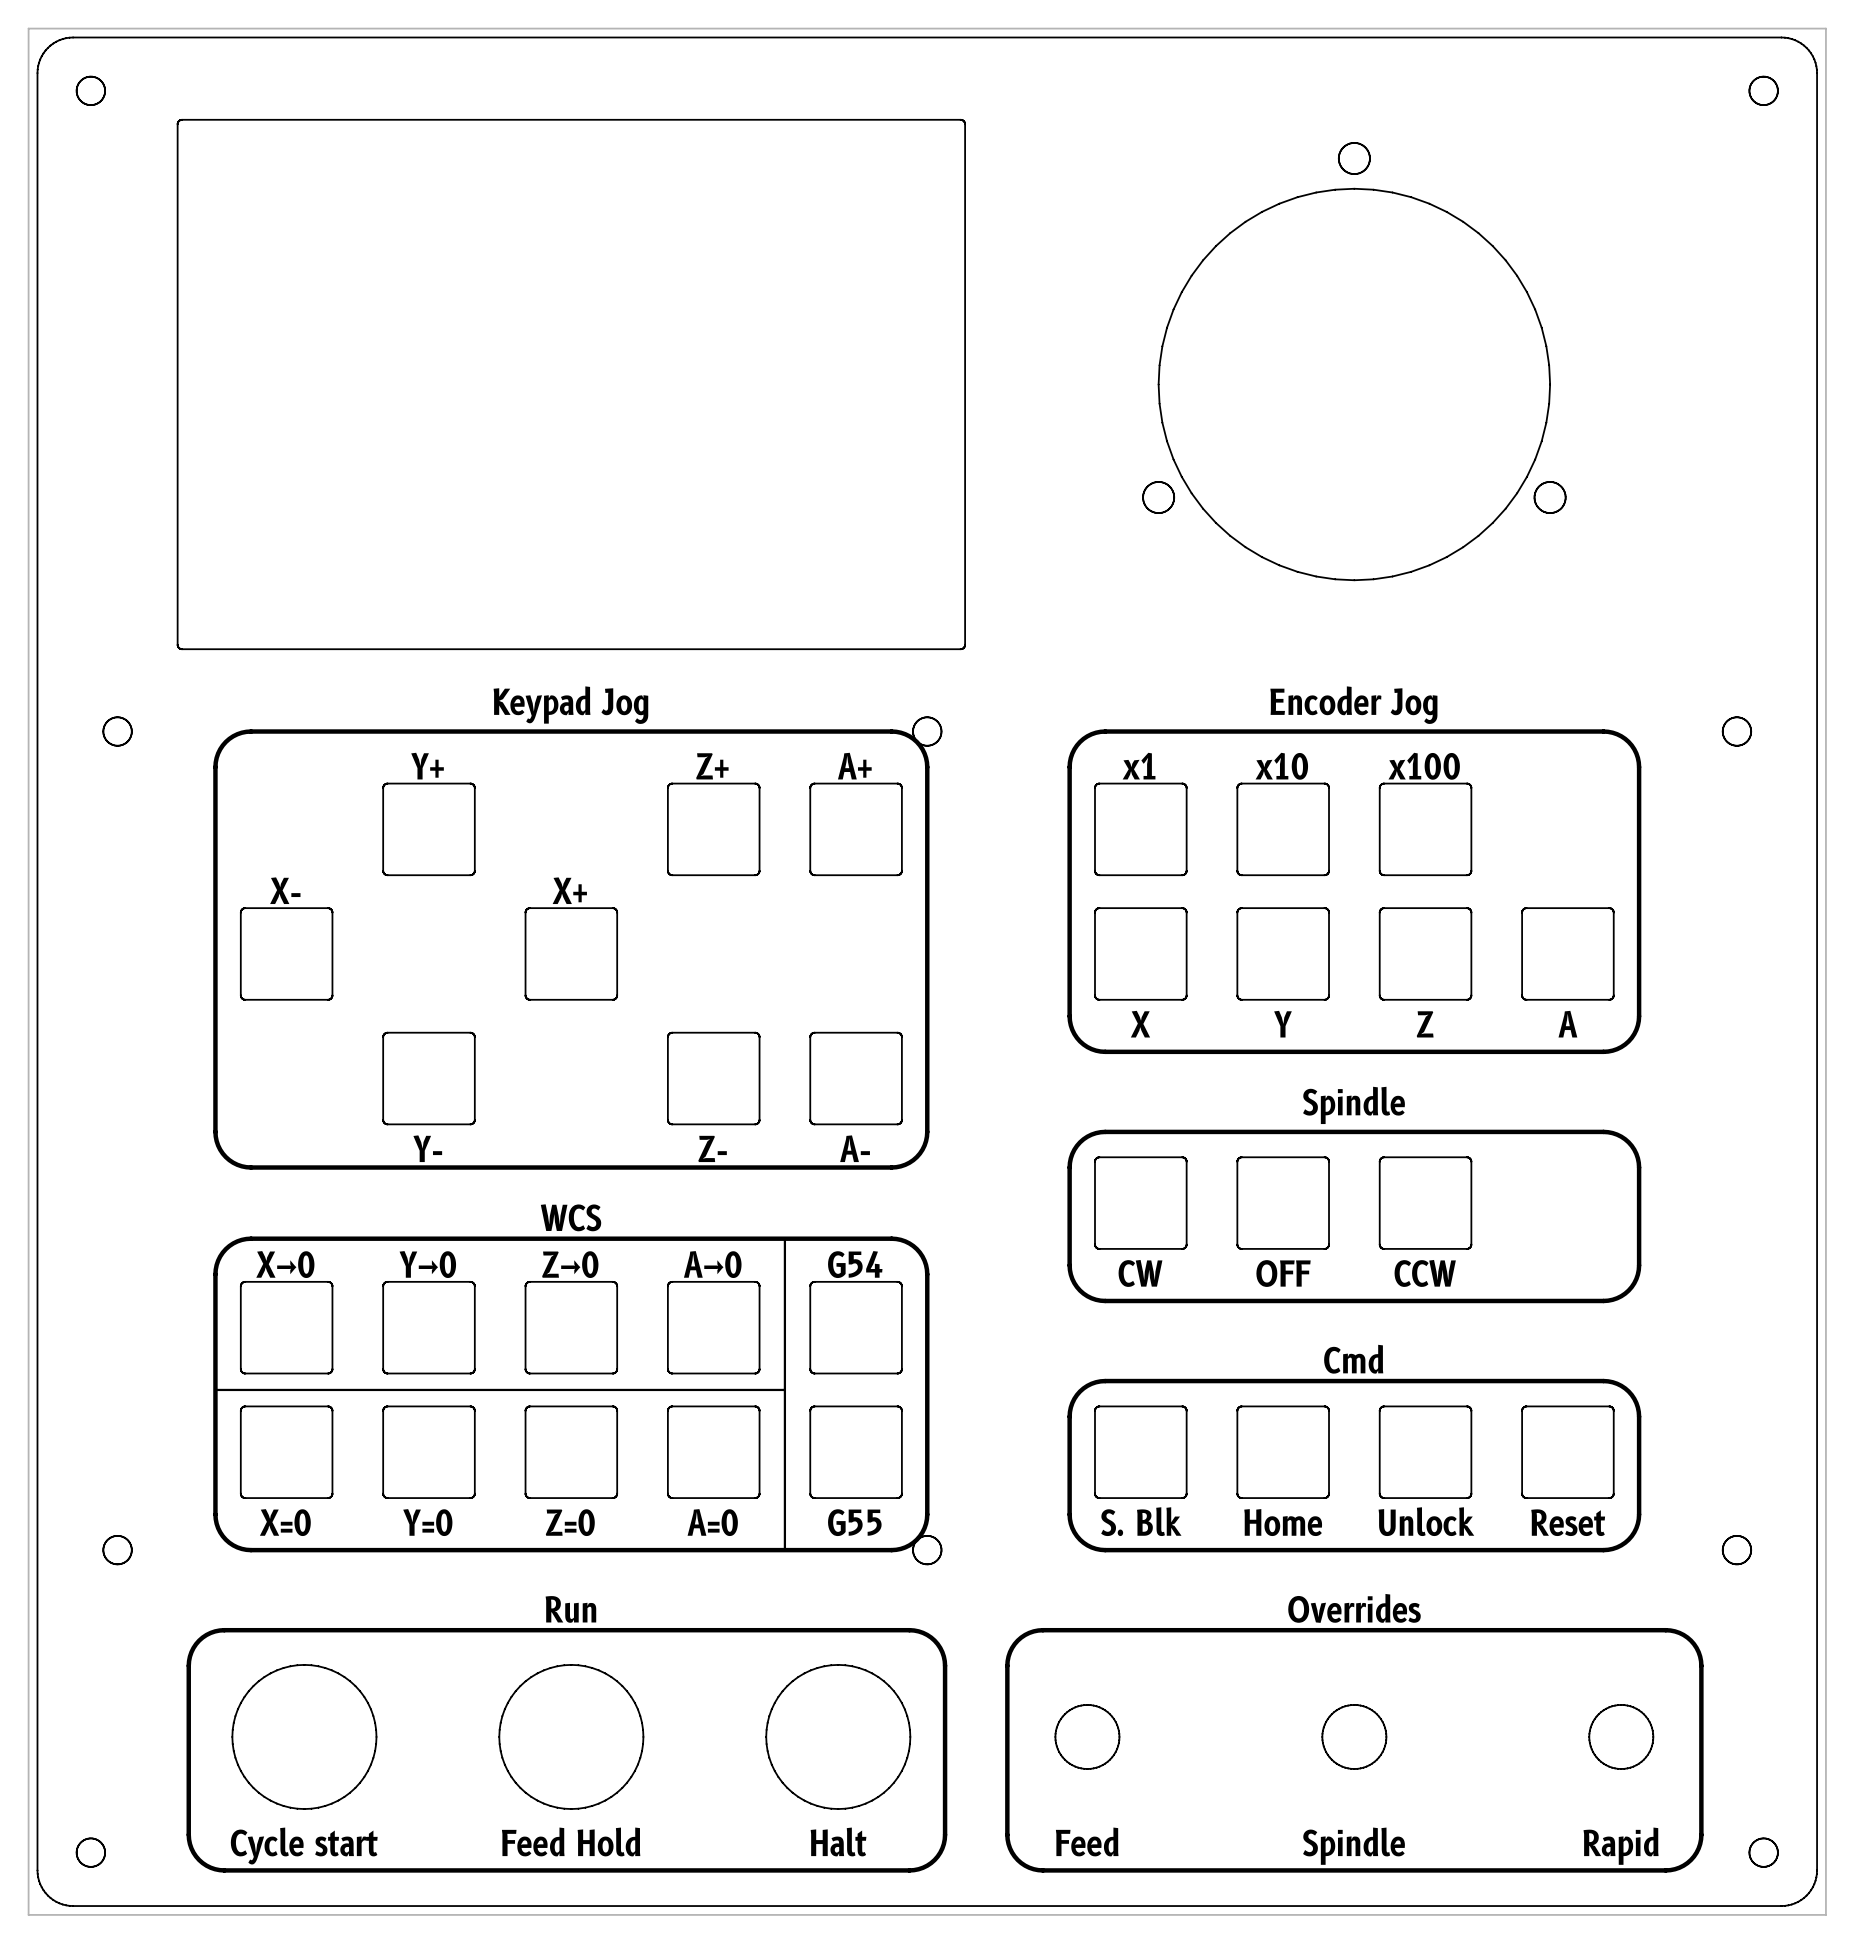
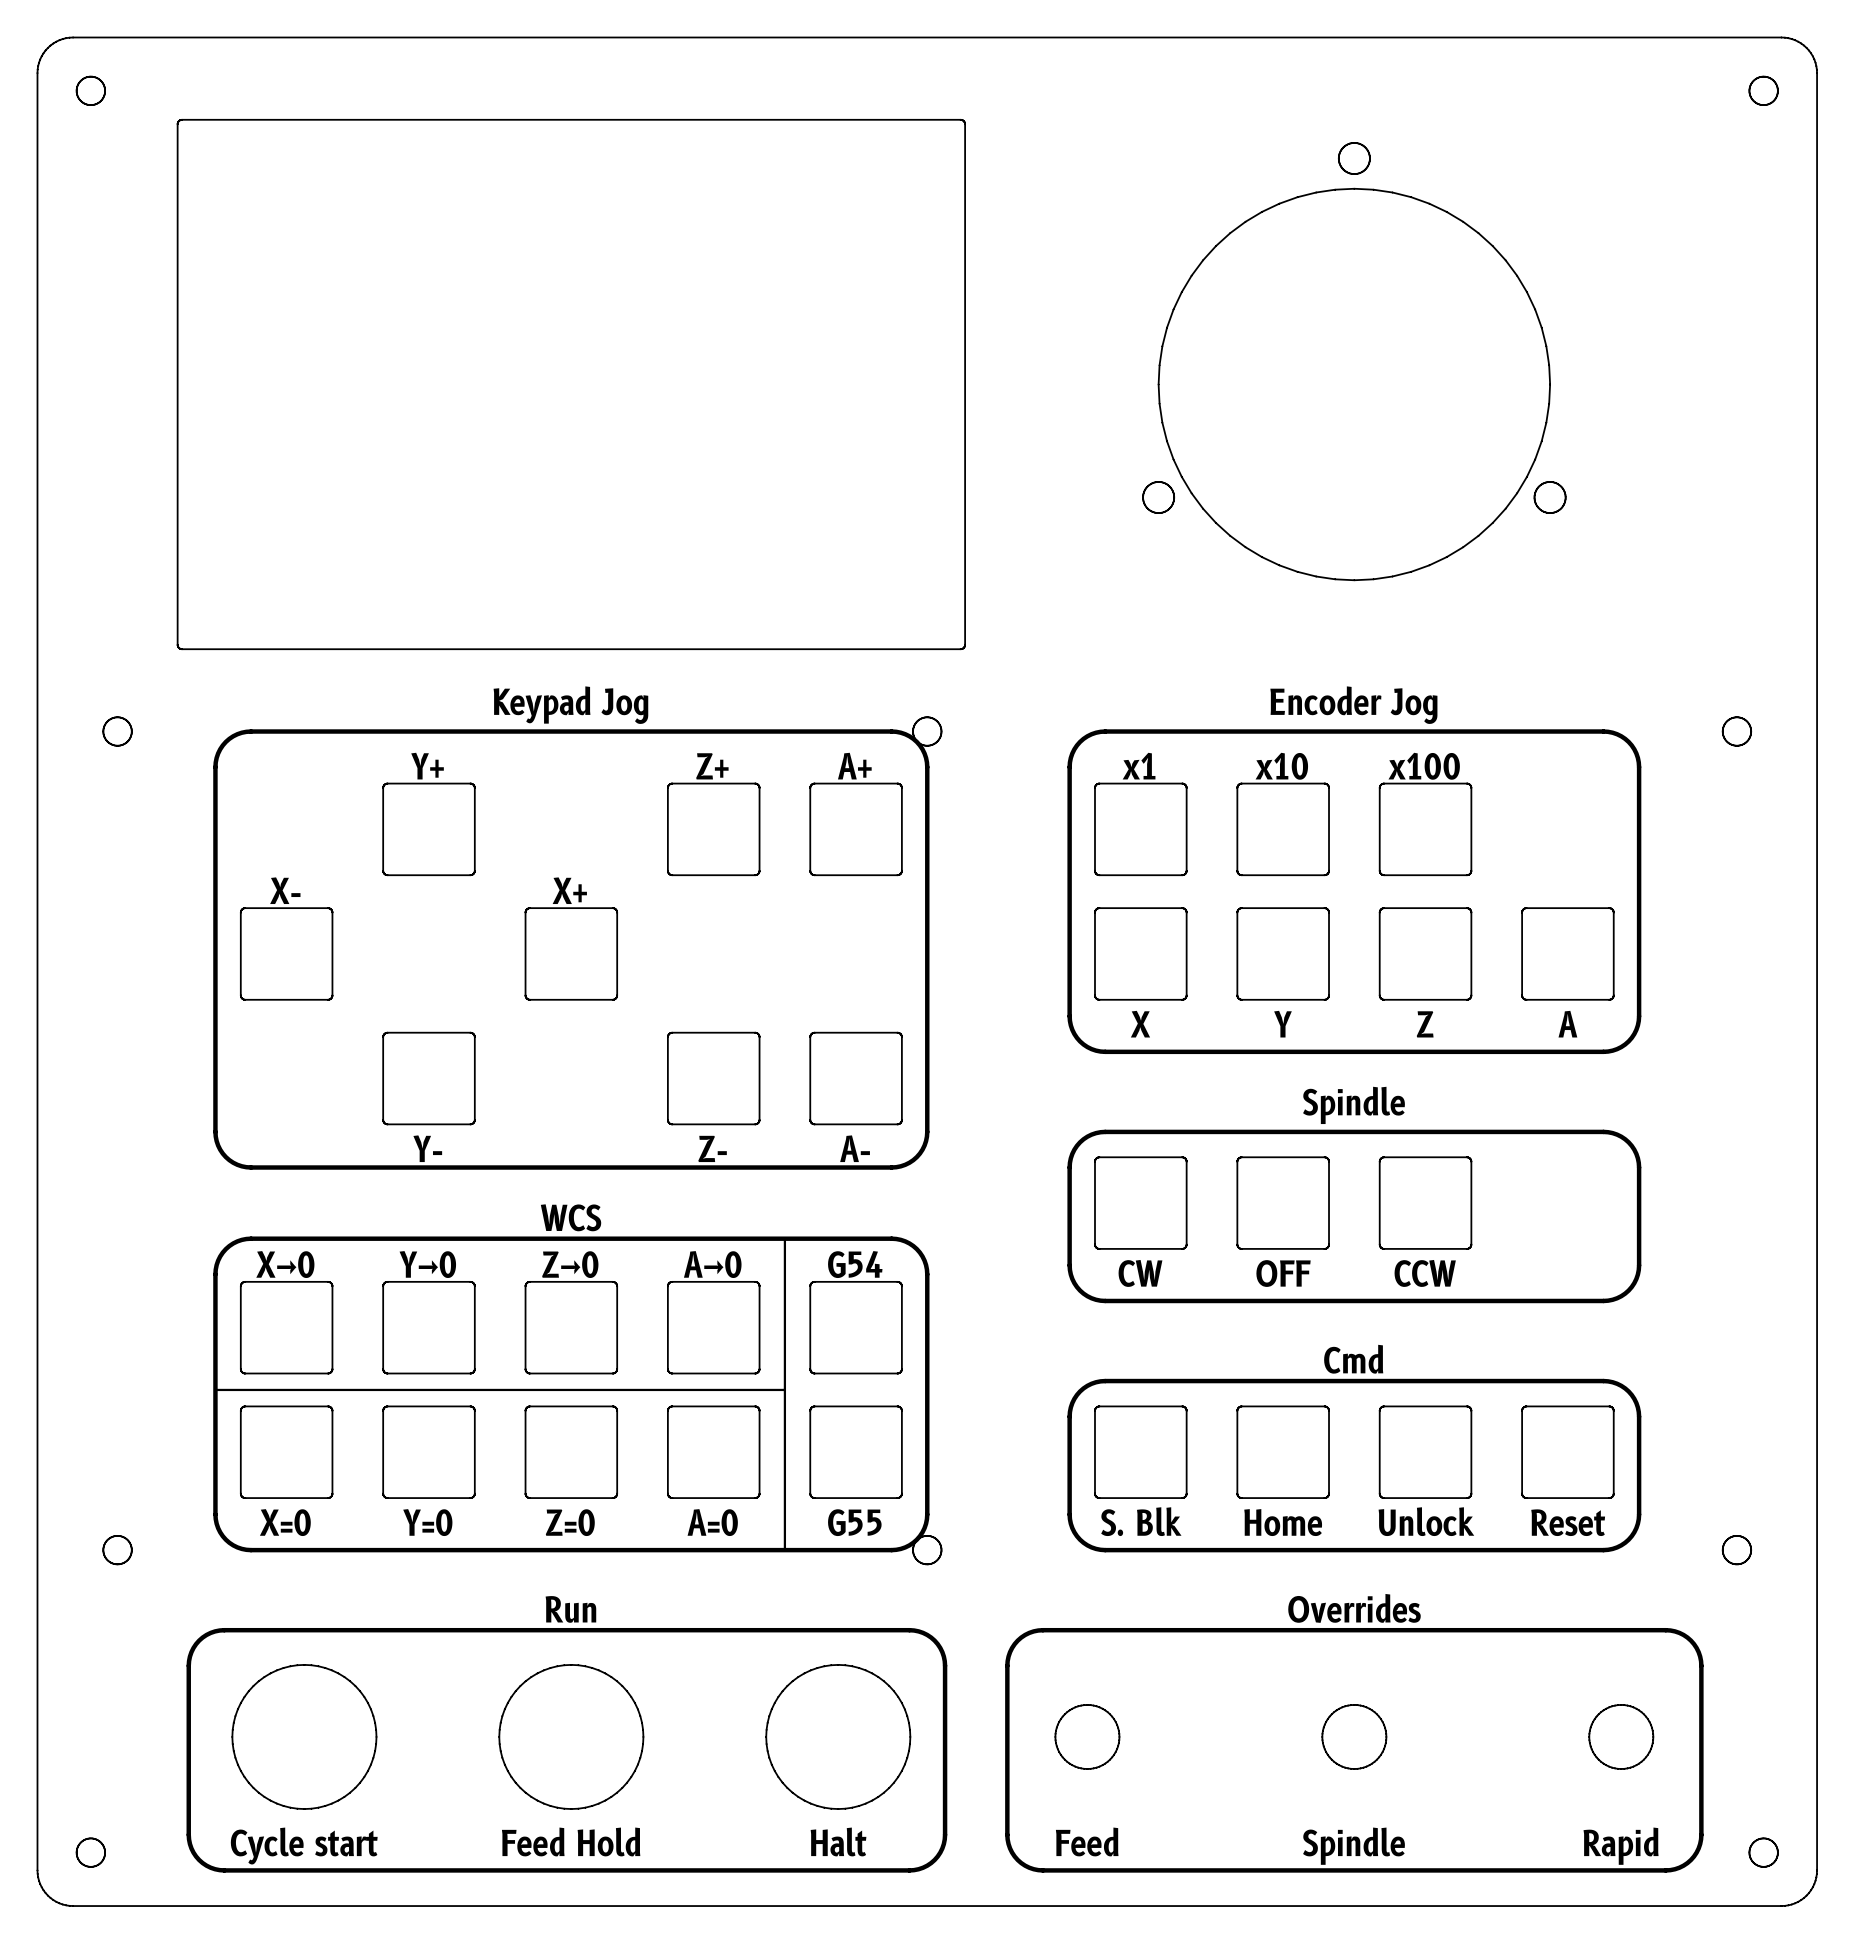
track: (28, 28) (1825, 28) (1825, 1914) (28, 1914) (28, 28) -> none

